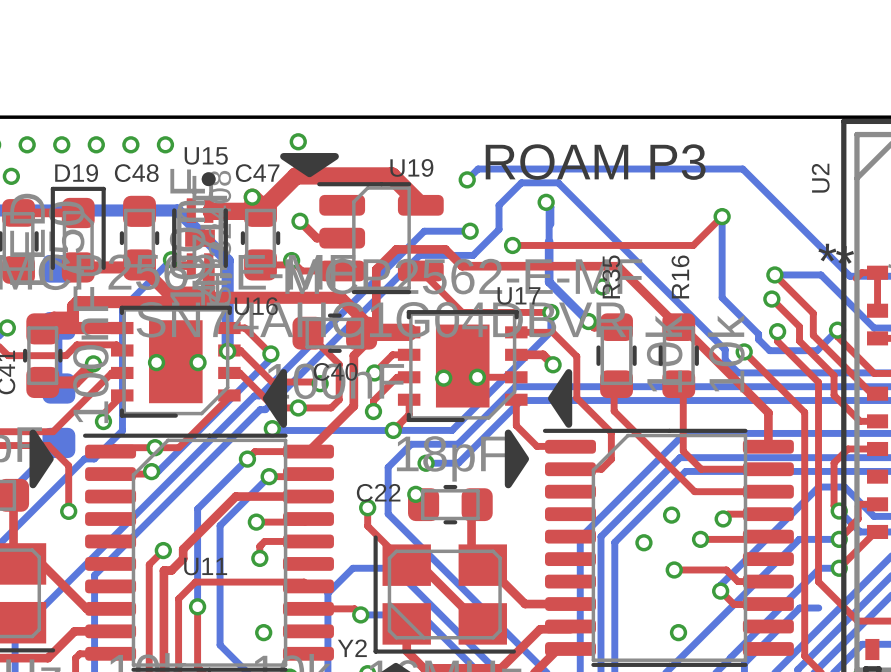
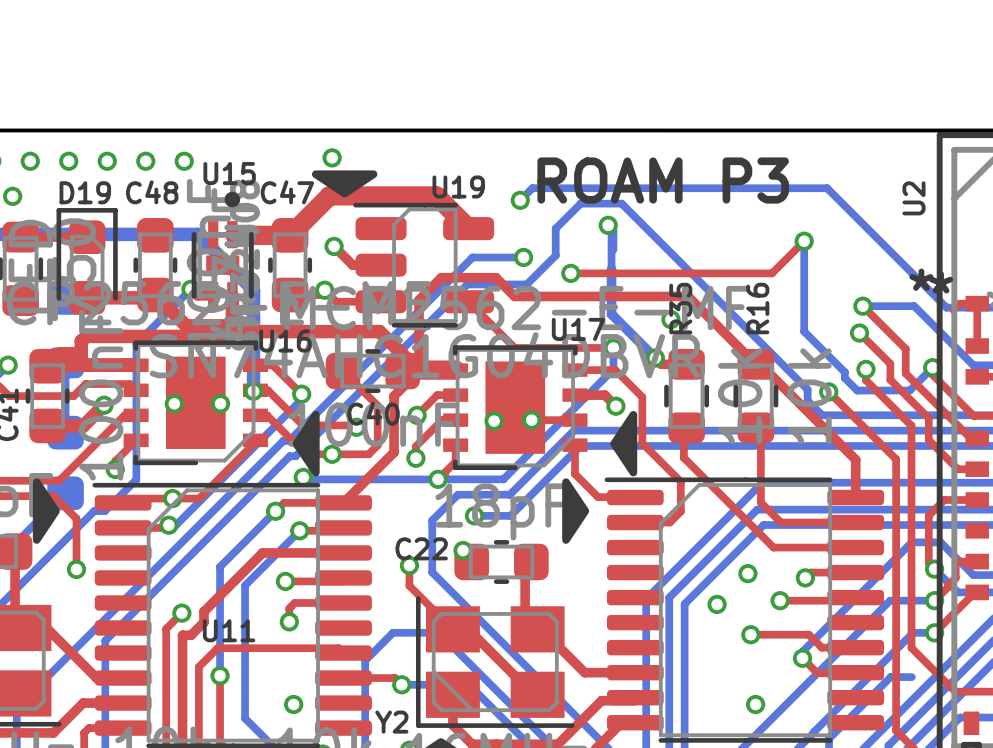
via: (252, 197) -> none

